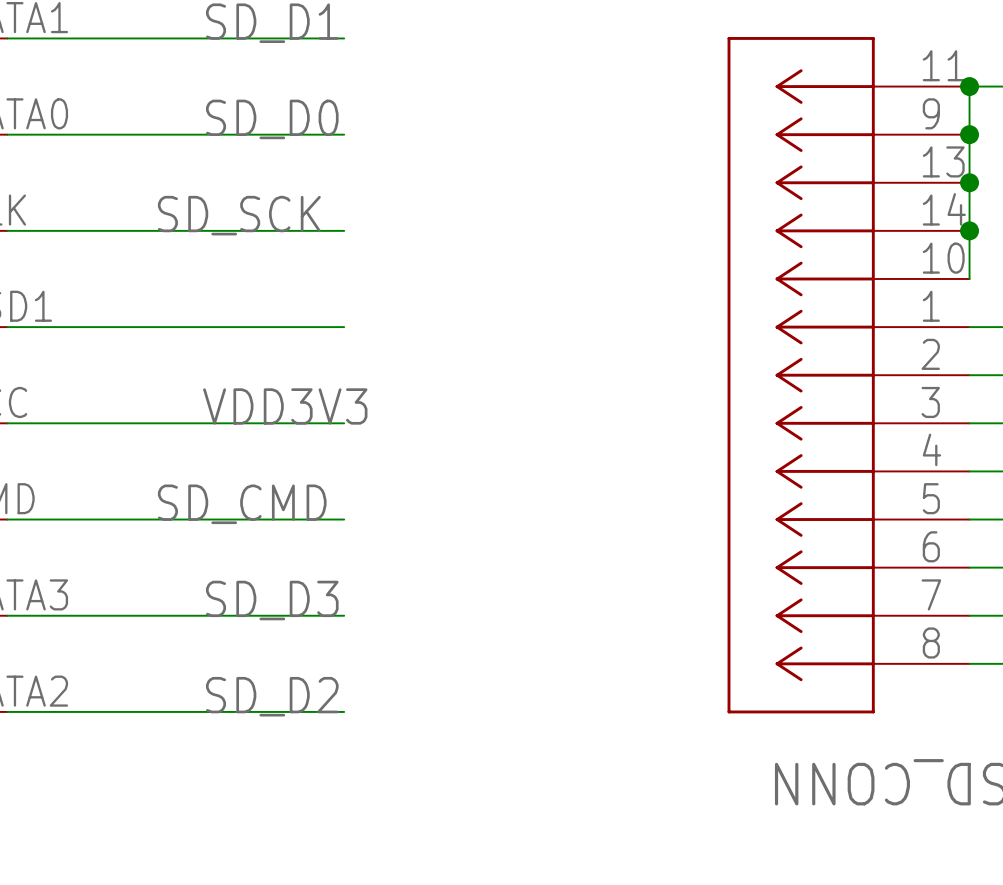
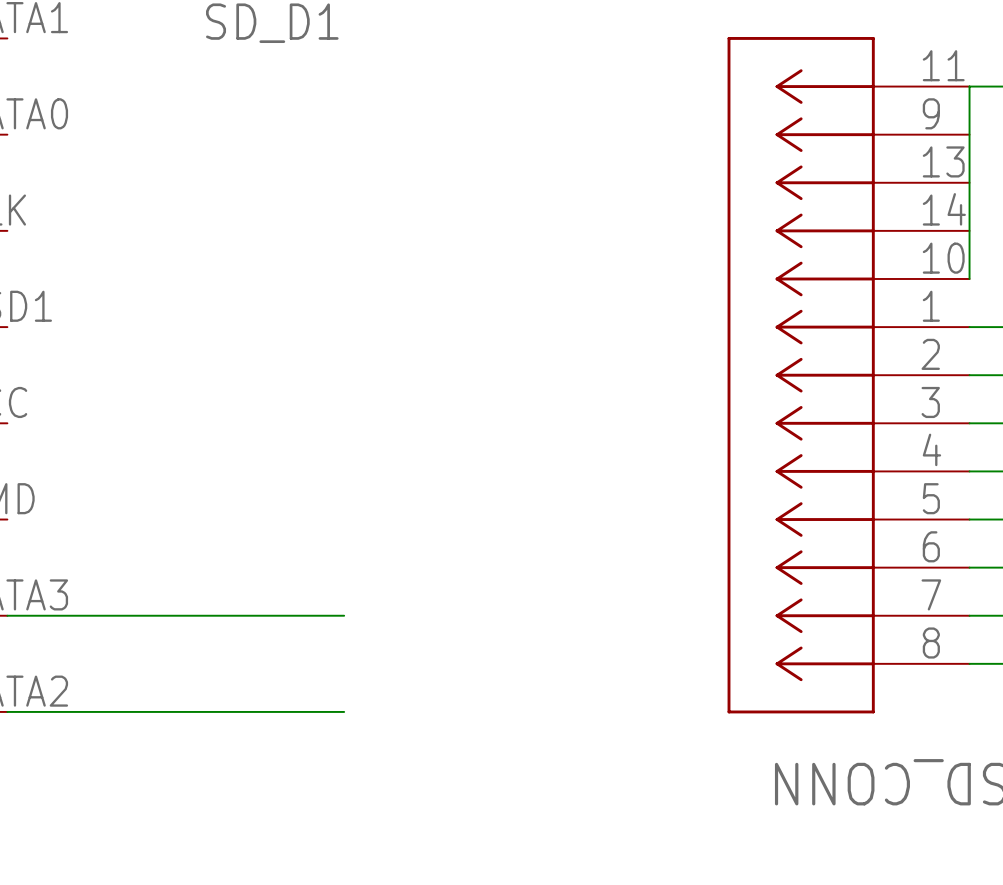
wire: (7, 38) (344, 38) -> none
junction: (969, 86) -> none
label: SD_D0 (272, 119) -> none
wire: (7, 134) (344, 134) -> none
junction: (969, 134) -> none
junction: (969, 182) -> none
label: SD_SCK (239, 215) -> none
wire: (7, 230) (344, 230) -> none
junction: (969, 230) -> none
wire: (7, 327) (344, 327) -> none
label: VDD3V3 (285, 406) -> none
wire: (7, 423) (344, 423) -> none
label: SD_CMD (242, 504) -> none
wire: (7, 519) (344, 519) -> none
label: SD_D3 (272, 600) -> none
label: SD_D2 (272, 696) -> none

